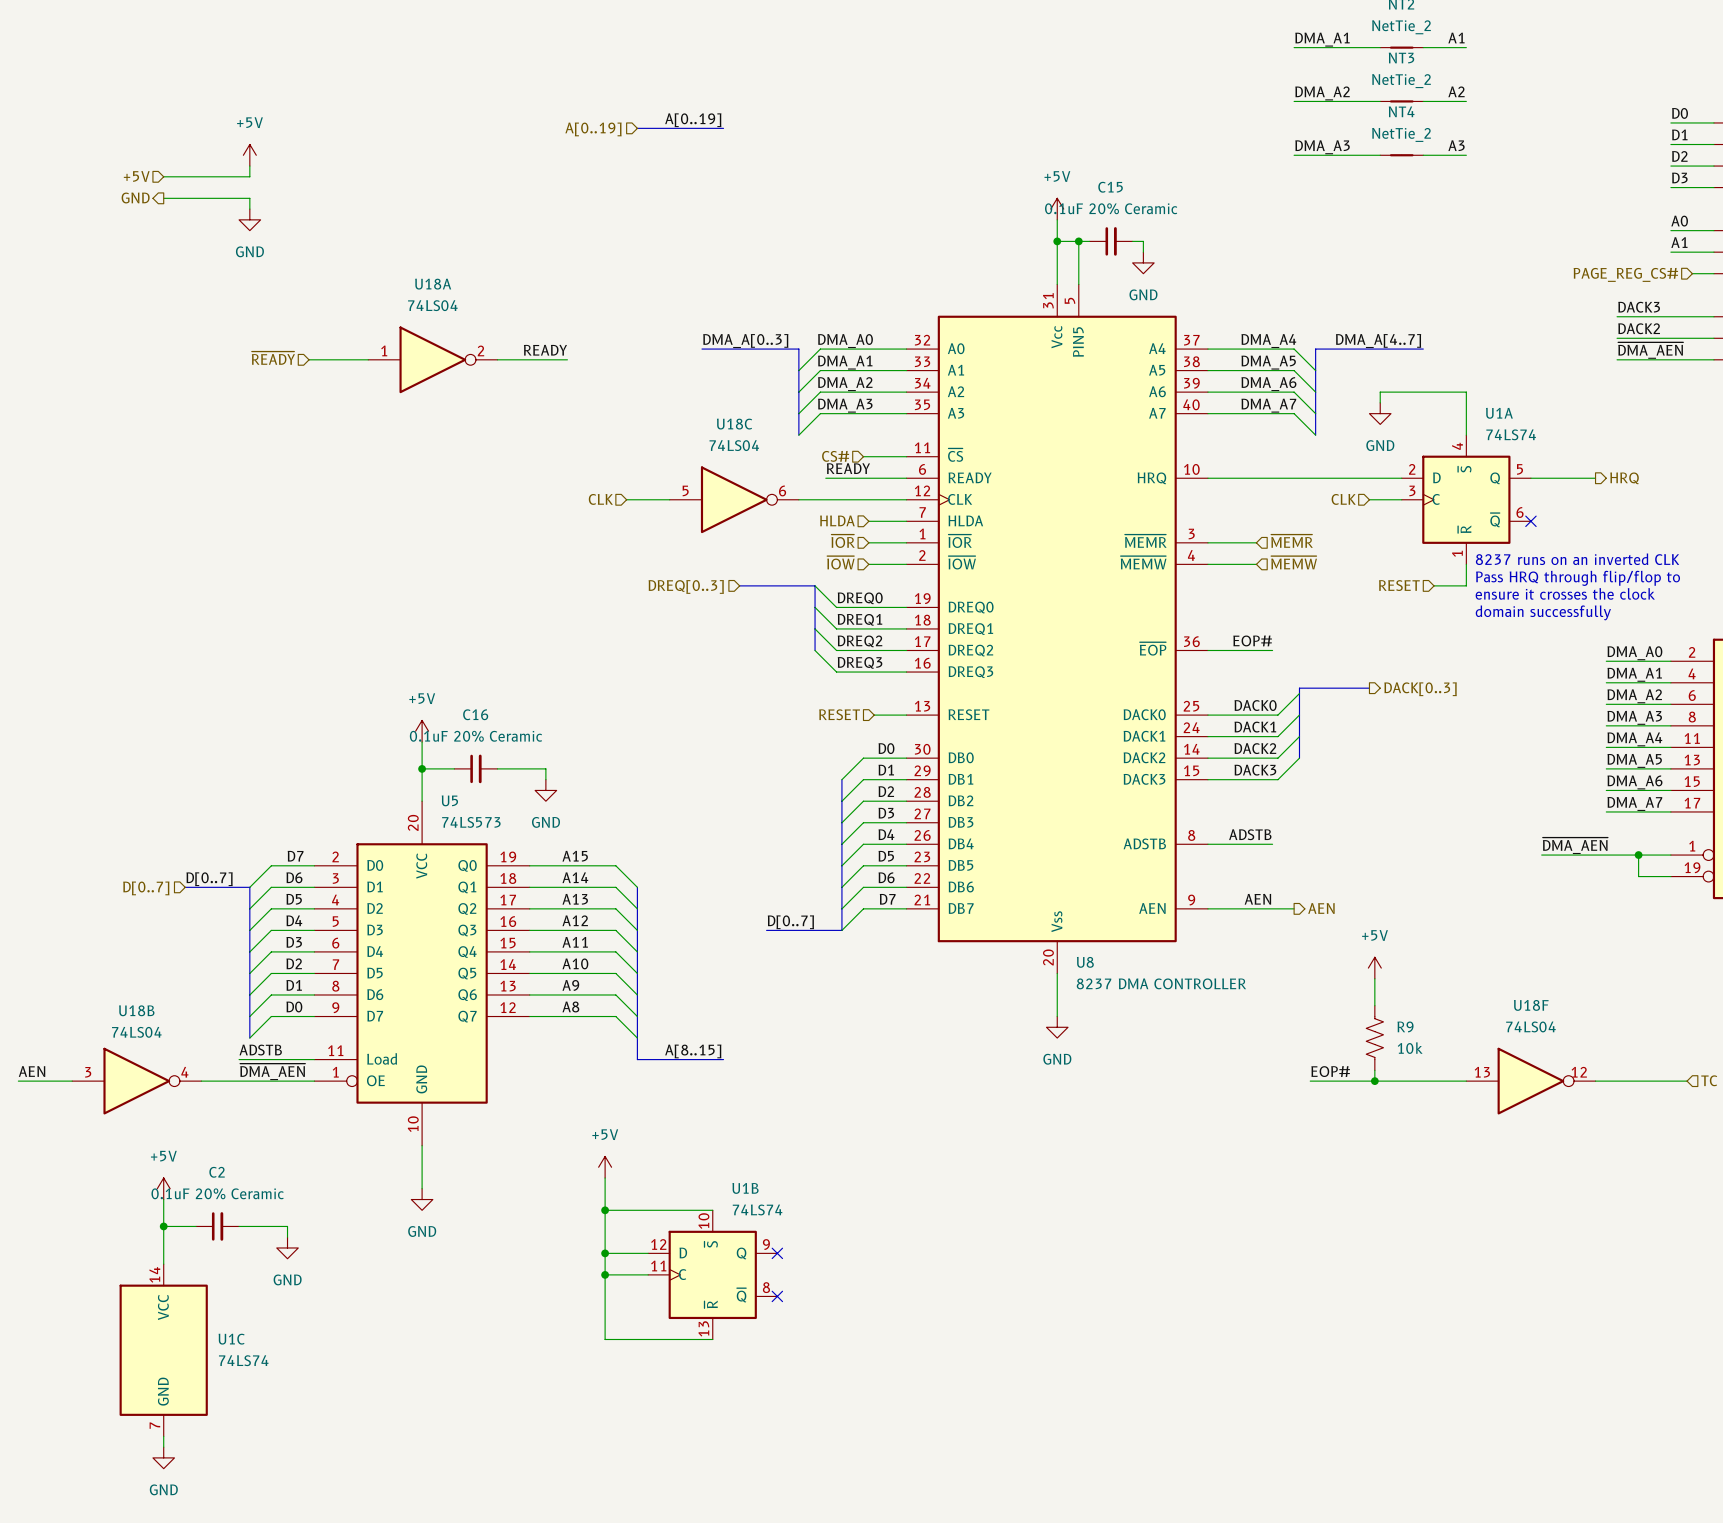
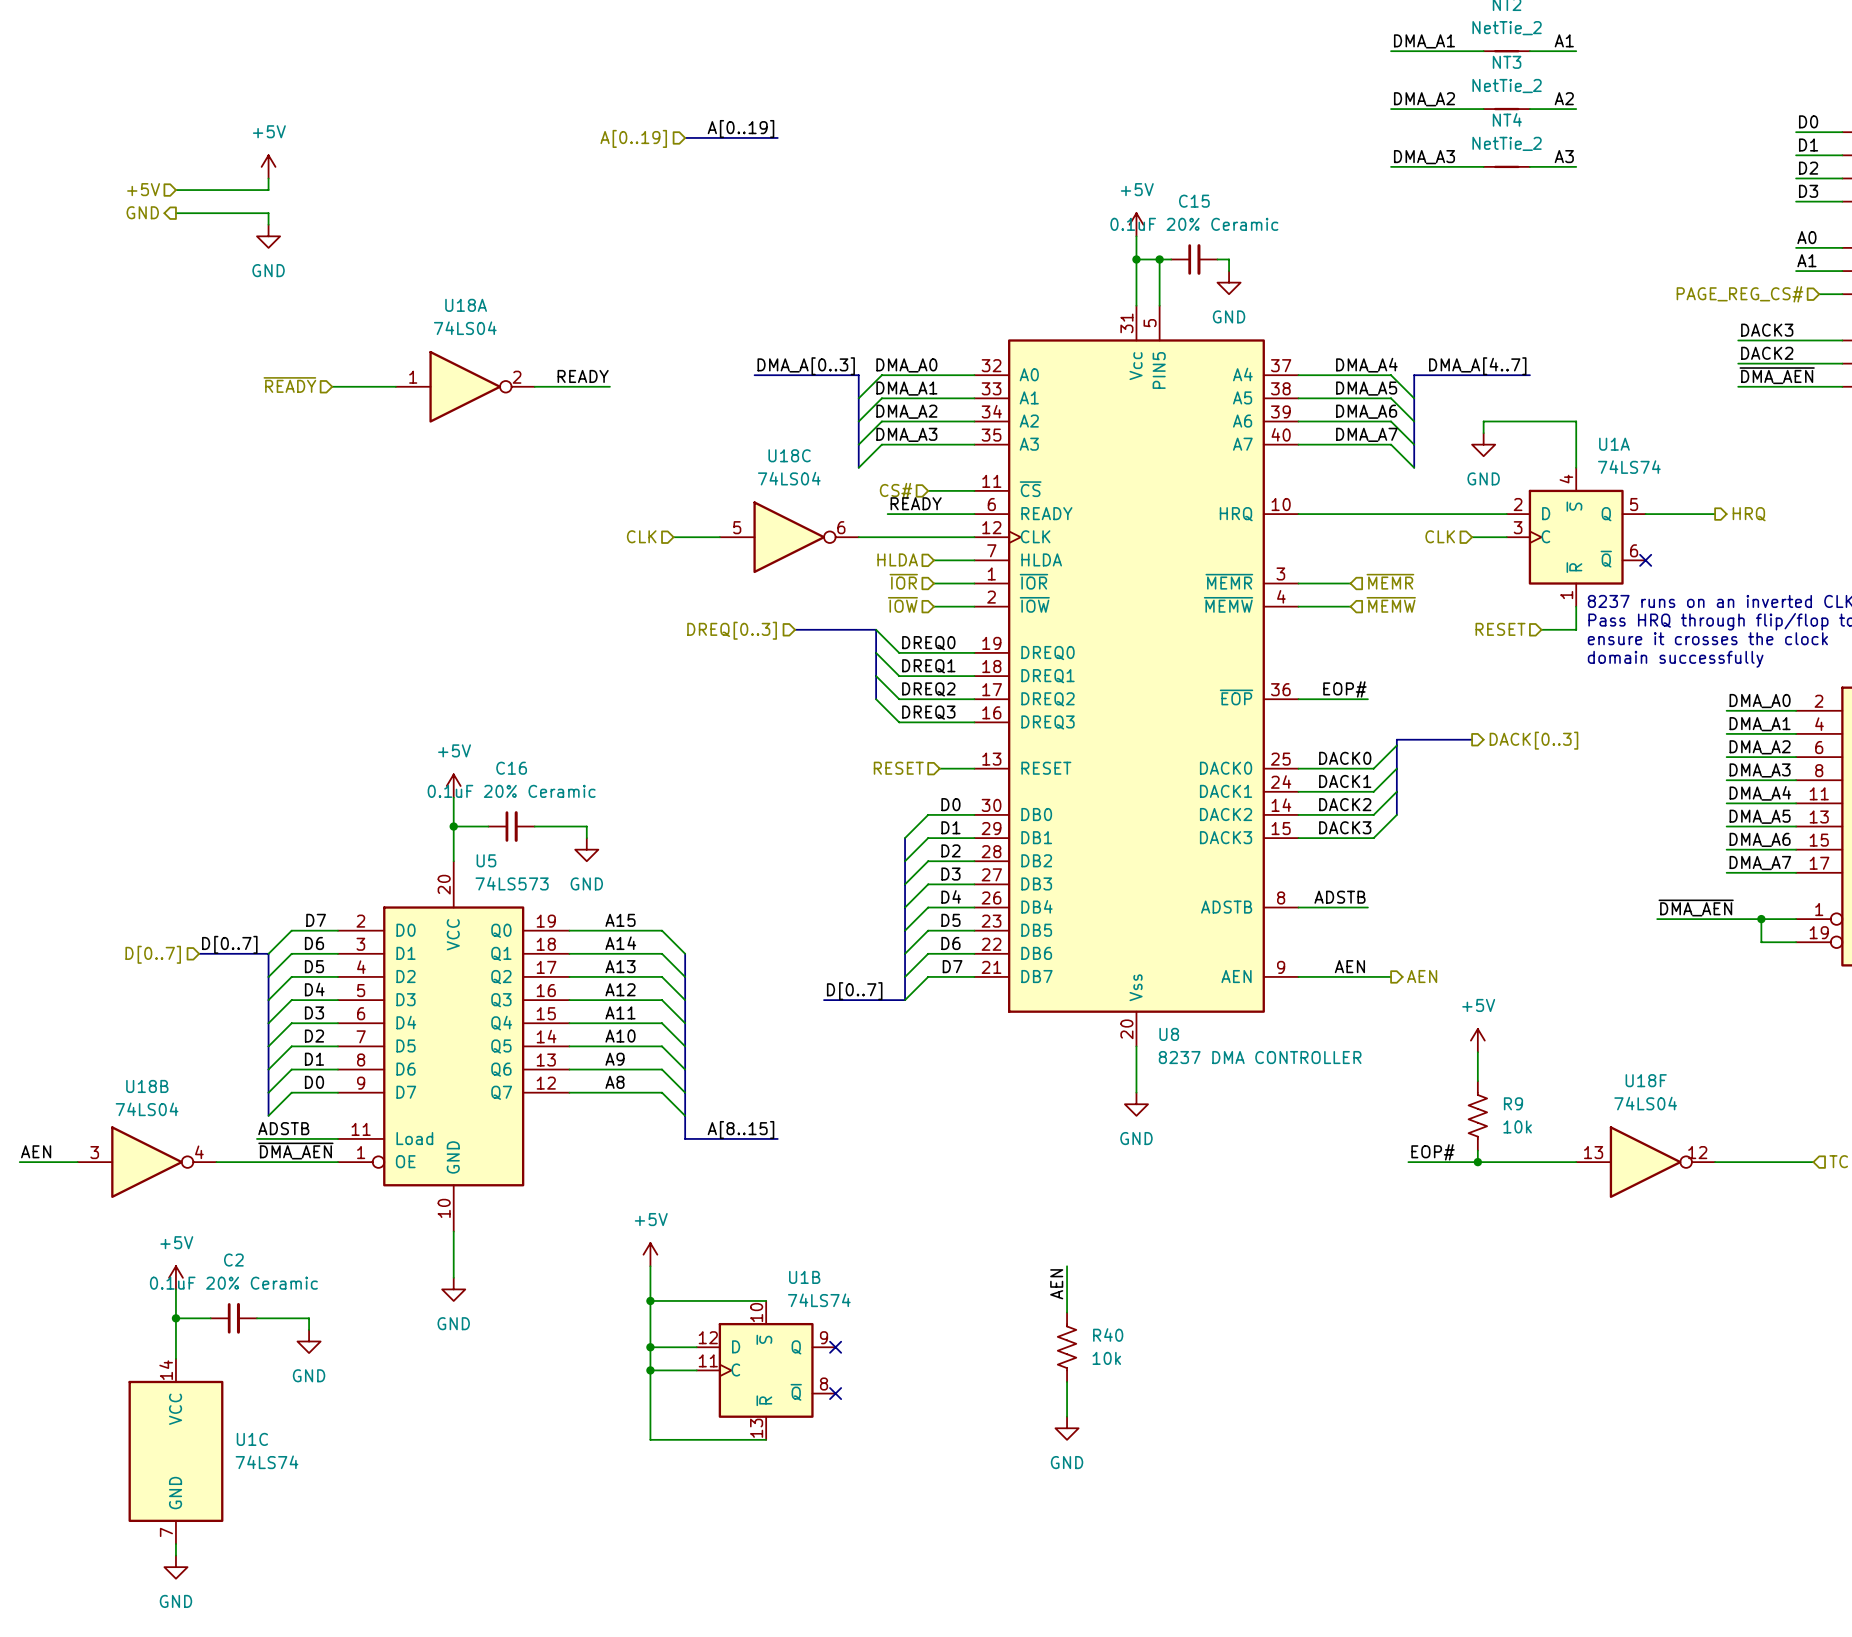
wire: none -> (1067, 1266) (1067, 1312)
label: none -> AEN (1056, 1284)
R40: none -> 10k (1067, 1347)
wire: none -> (1067, 1381) (1067, 1416)
power symbol: none -> GND (1067, 1428)

